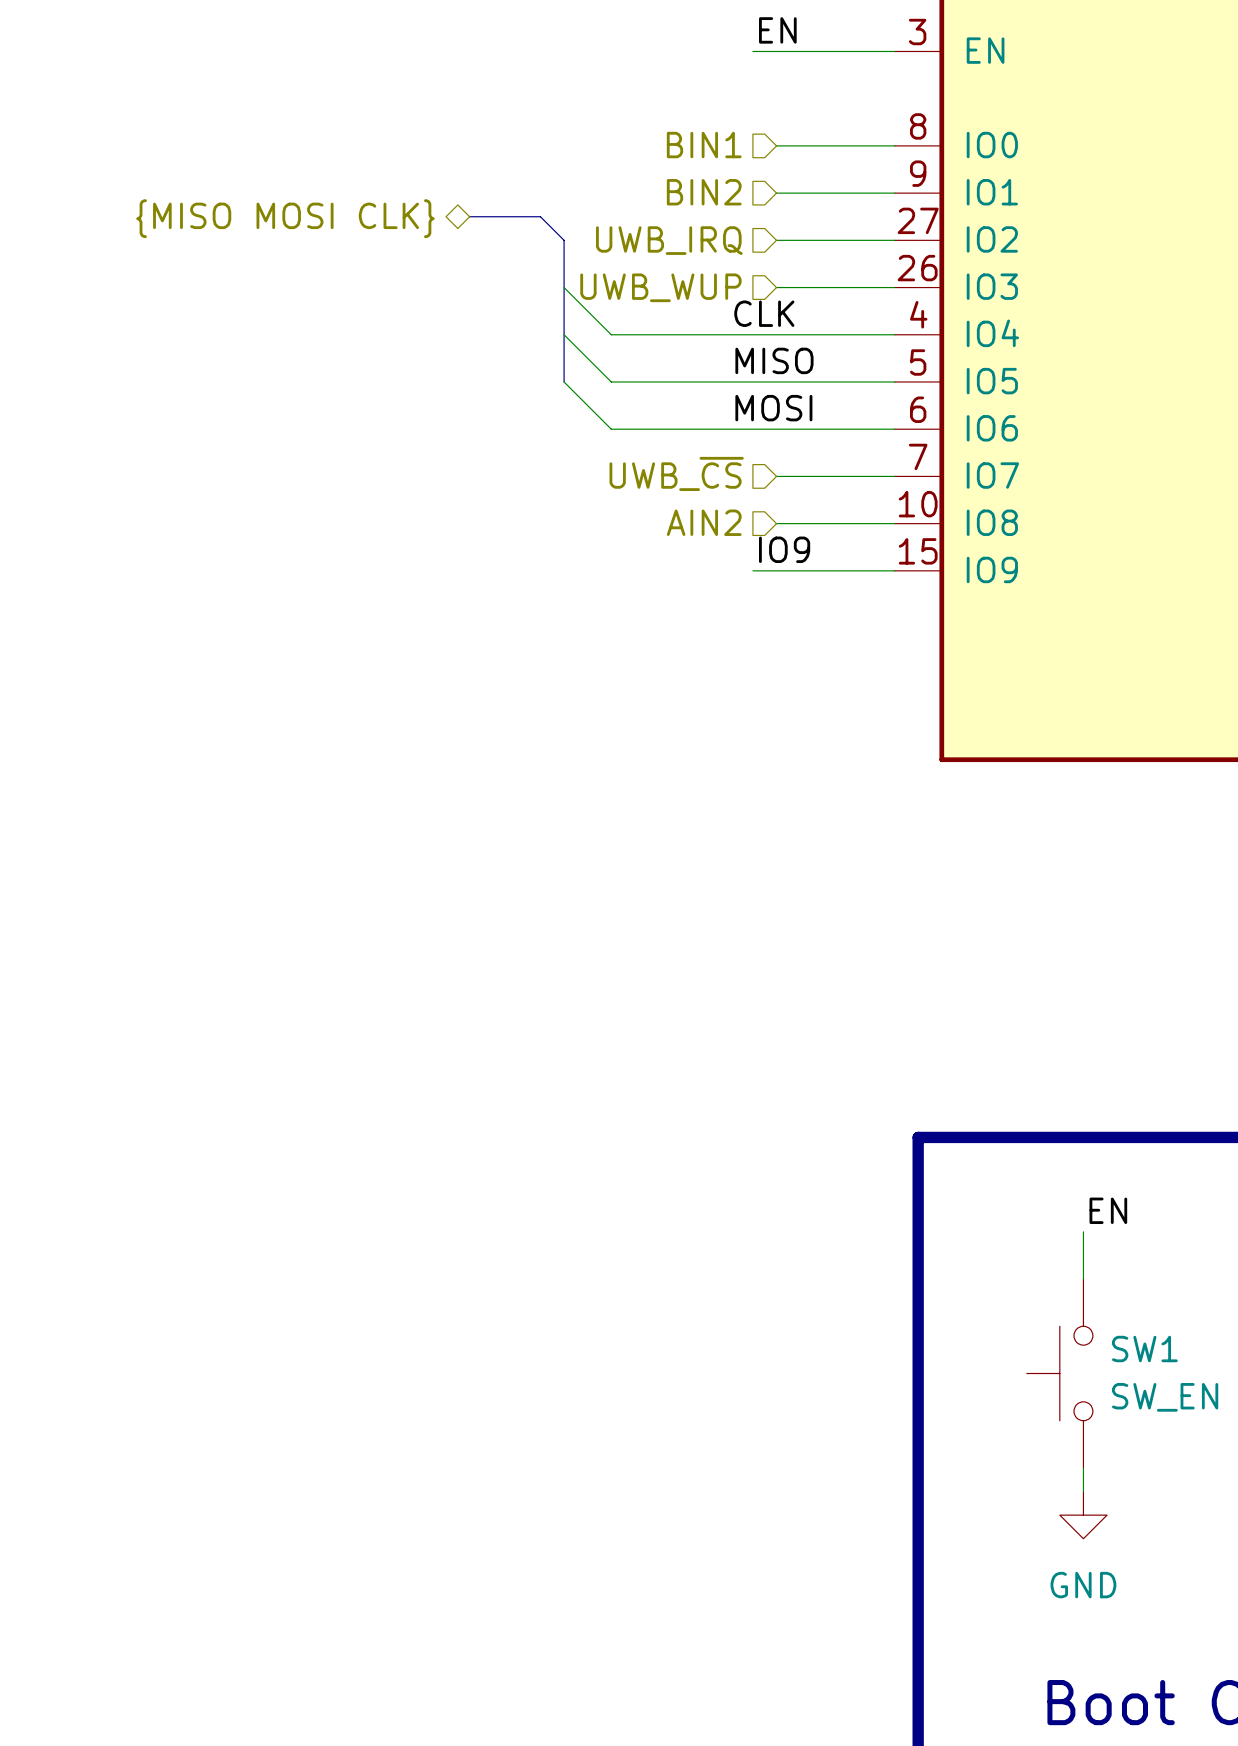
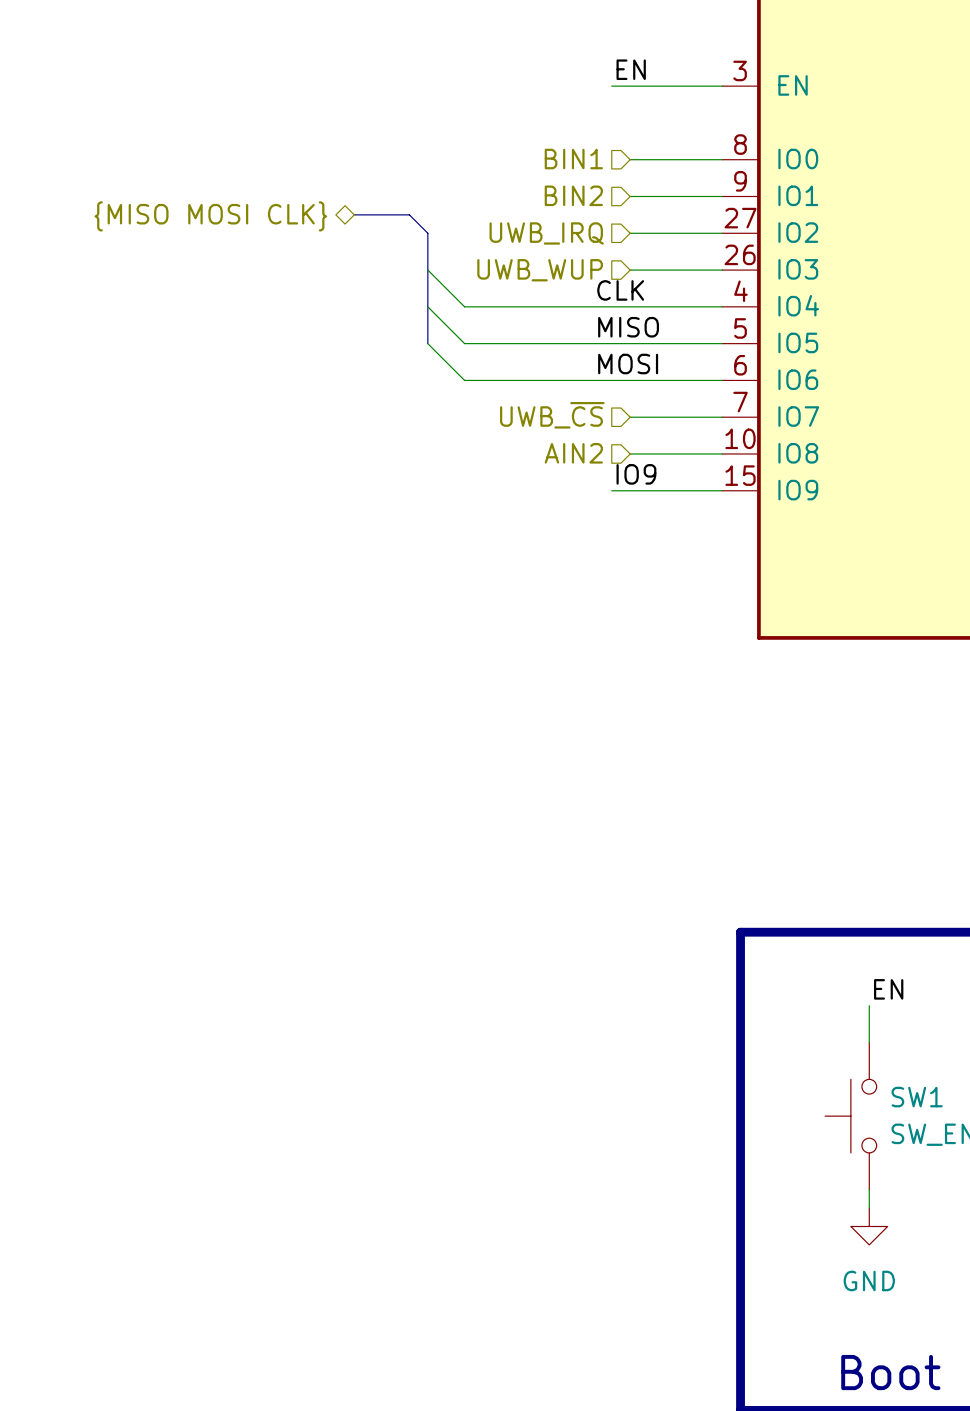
bus: none -> (354, 214) (391, 214)
bus: (493, 216) (540, 216) (564, 240) (564, 381) -> (409, 214) (427, 233) (427, 343)
hierarchical label position: {MISO MOSI CLK} (285, 218) -> {MISO MOSI CLK} (210, 216)
wire: (564, 287) (611, 334) -> (427, 270) (464, 306) (501, 306)
wire: (564, 334) (611, 381) -> (427, 306) (464, 343) (501, 343)
wire: (564, 381) (611, 429) -> (427, 343) (464, 380) (501, 380)

